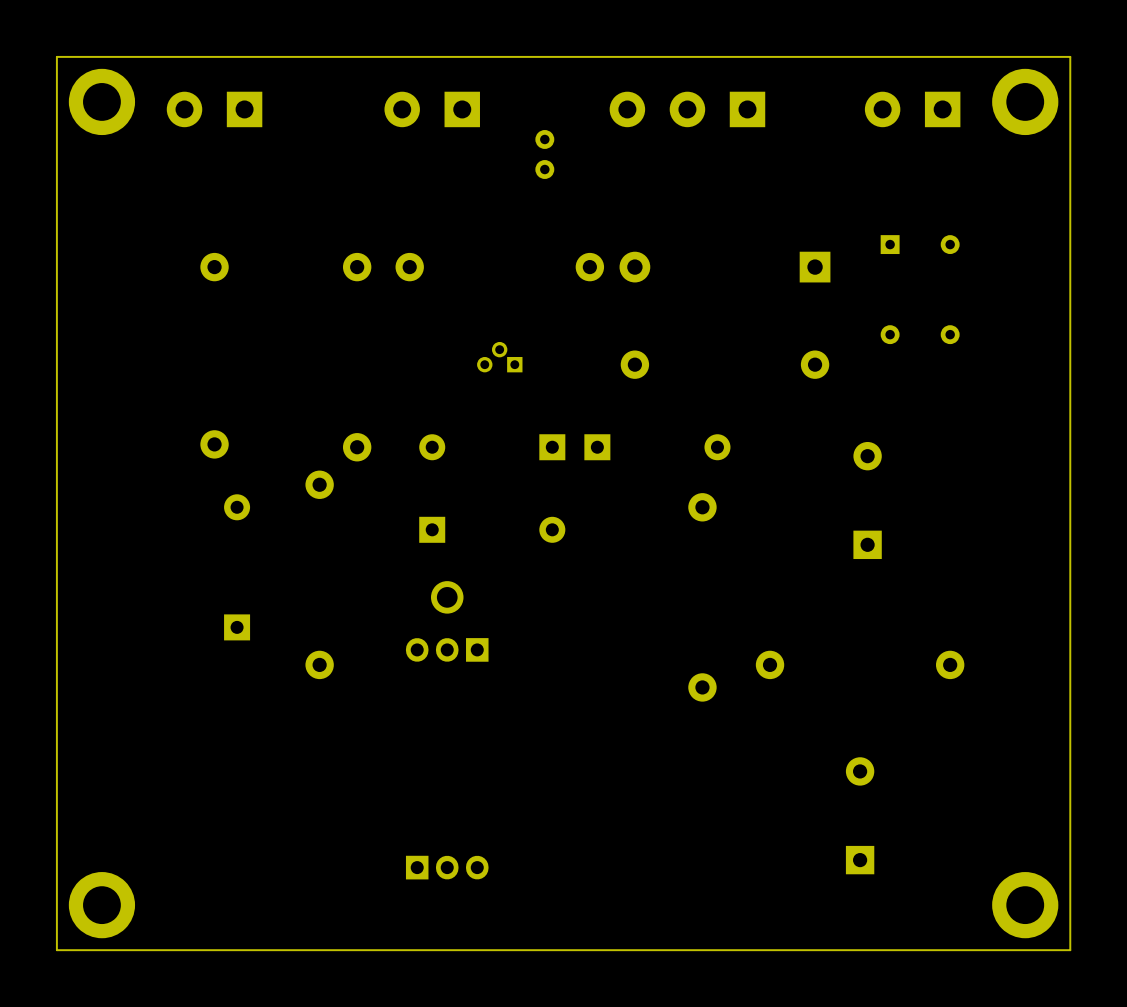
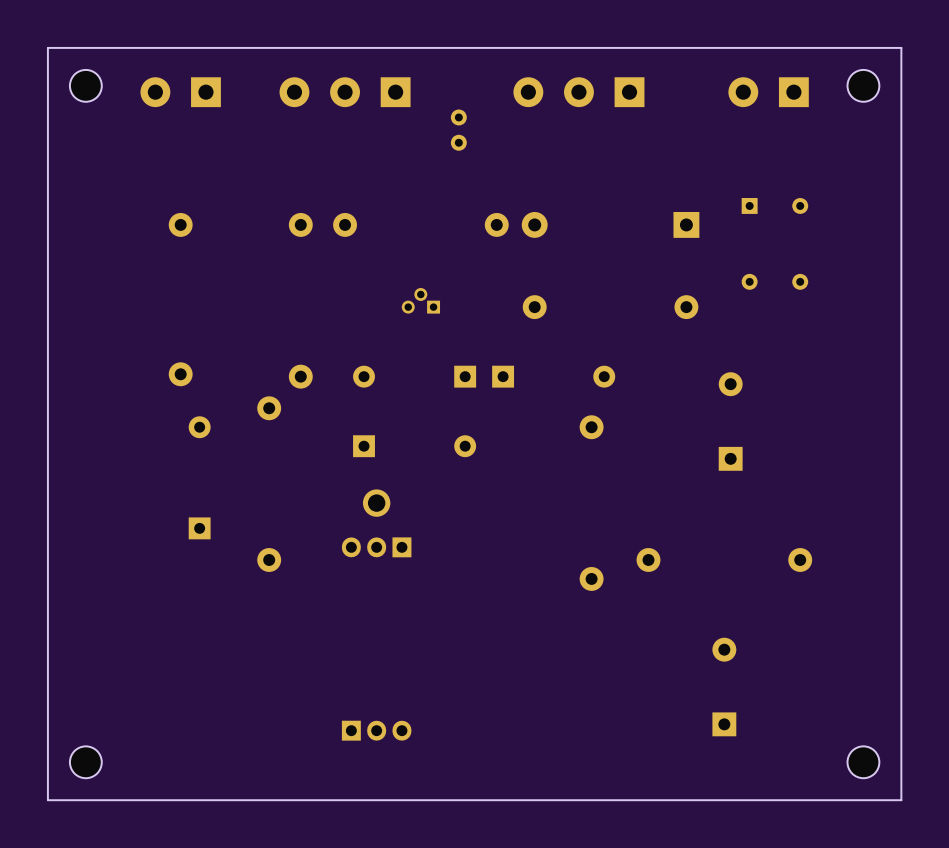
part footprint: [68, 68, 136, 136] -> [69, 69, 102, 102]
part footprint: [992, 68, 1059, 136] -> [847, 69, 880, 102]
part: none -> (345, 92)
part: (432, 109) -> none
part footprint: [68, 872, 136, 939] -> [69, 746, 102, 779]
part footprint: [992, 872, 1059, 939] -> [847, 746, 880, 779]

